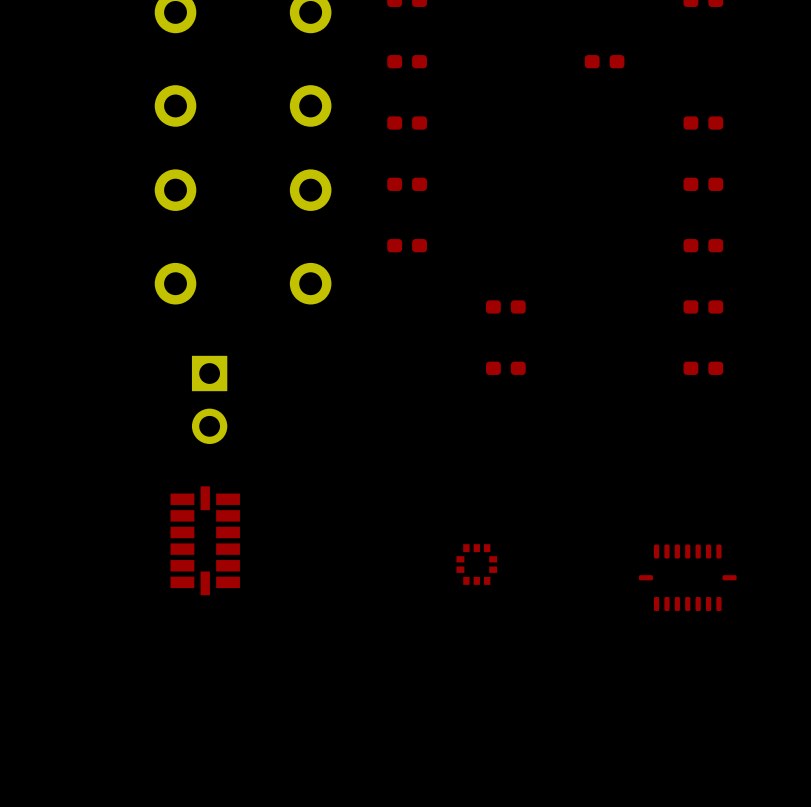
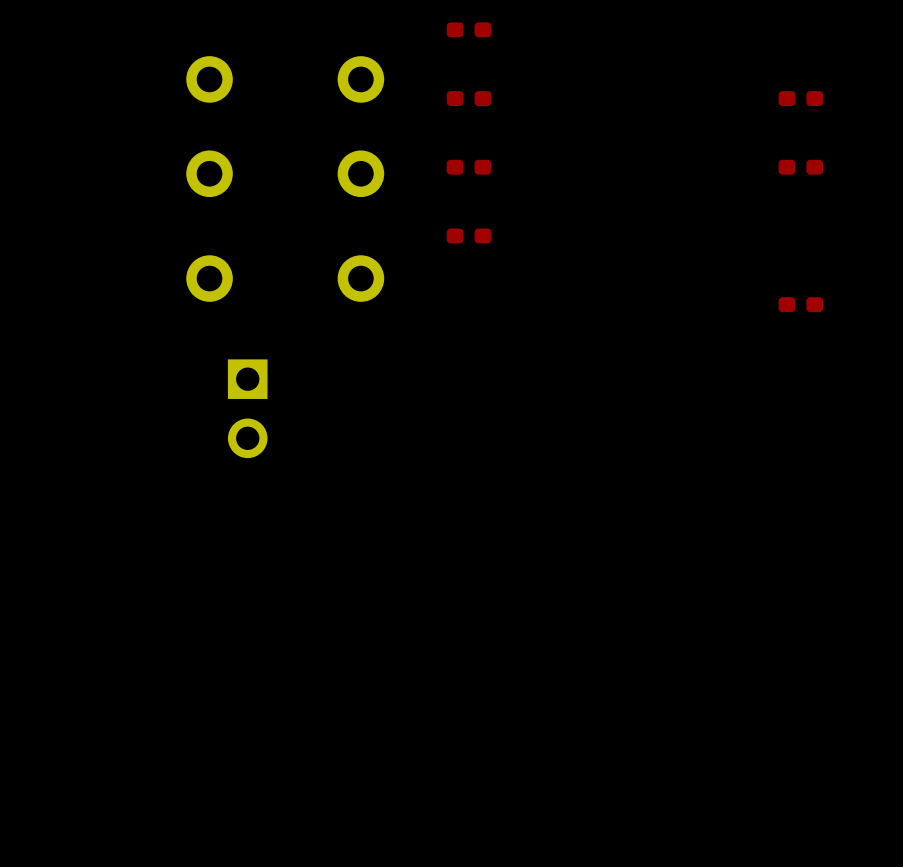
part: (604, 61) -> none
part: (703, 245) -> none
part: (505, 306) -> none
part: (505, 368) -> none
part: (703, 368) -> none
part: (205, 540) -> none
part: (476, 564) -> none
part: (687, 577) -> none

